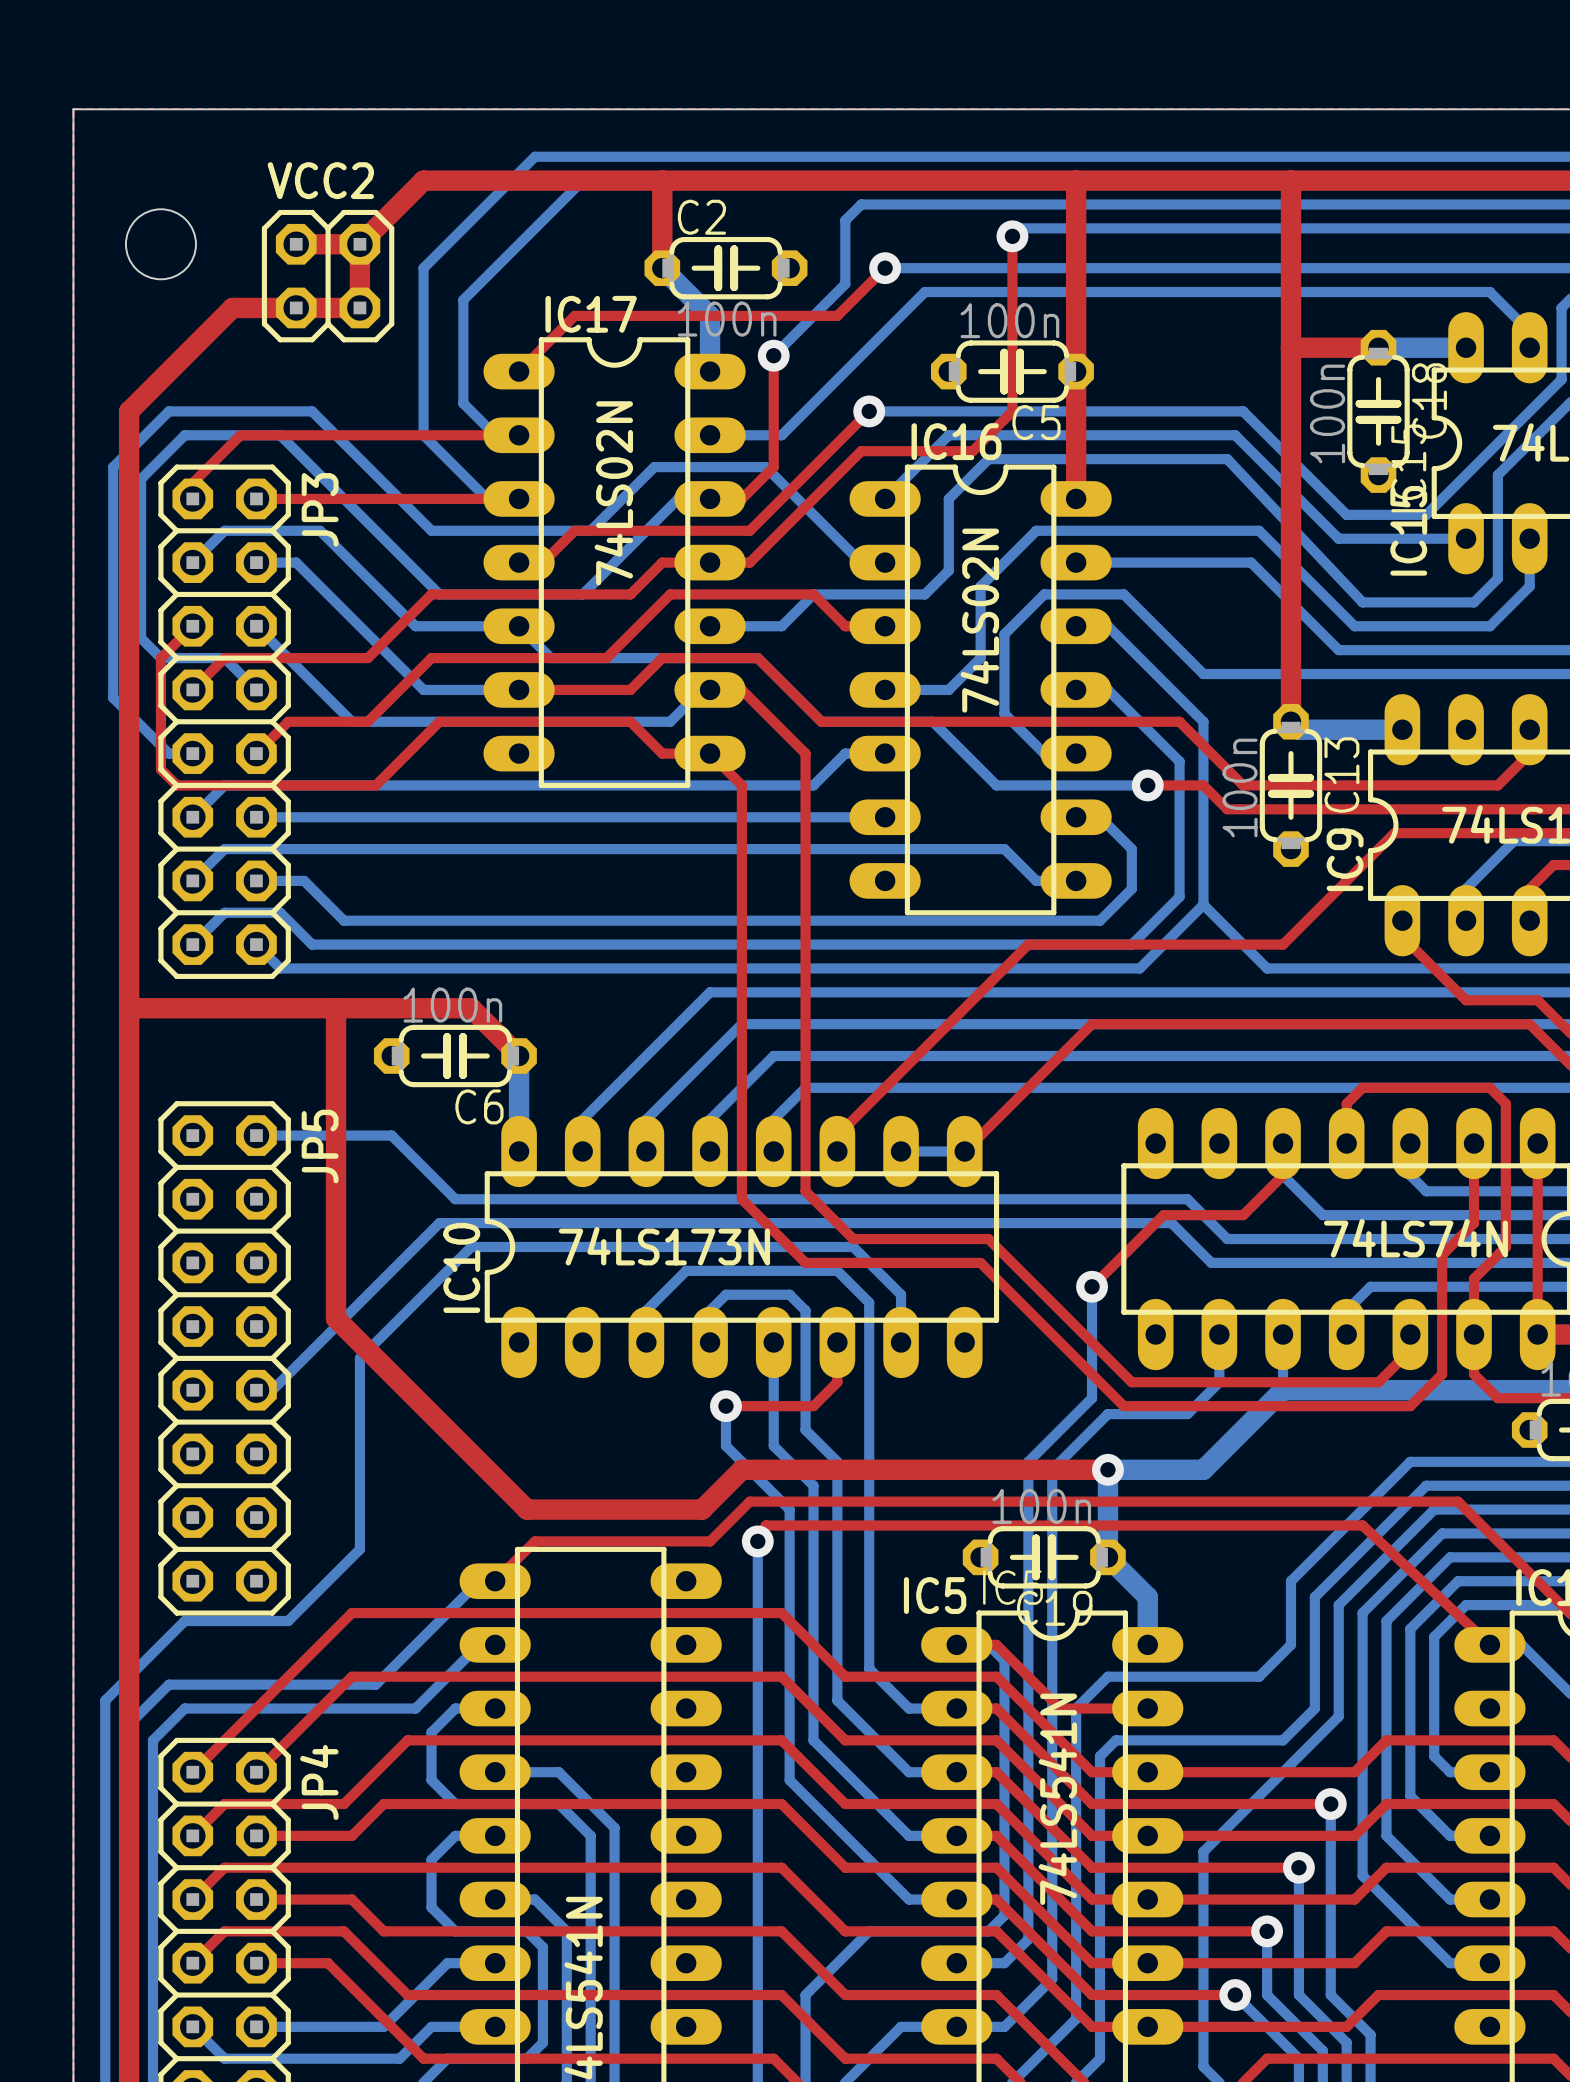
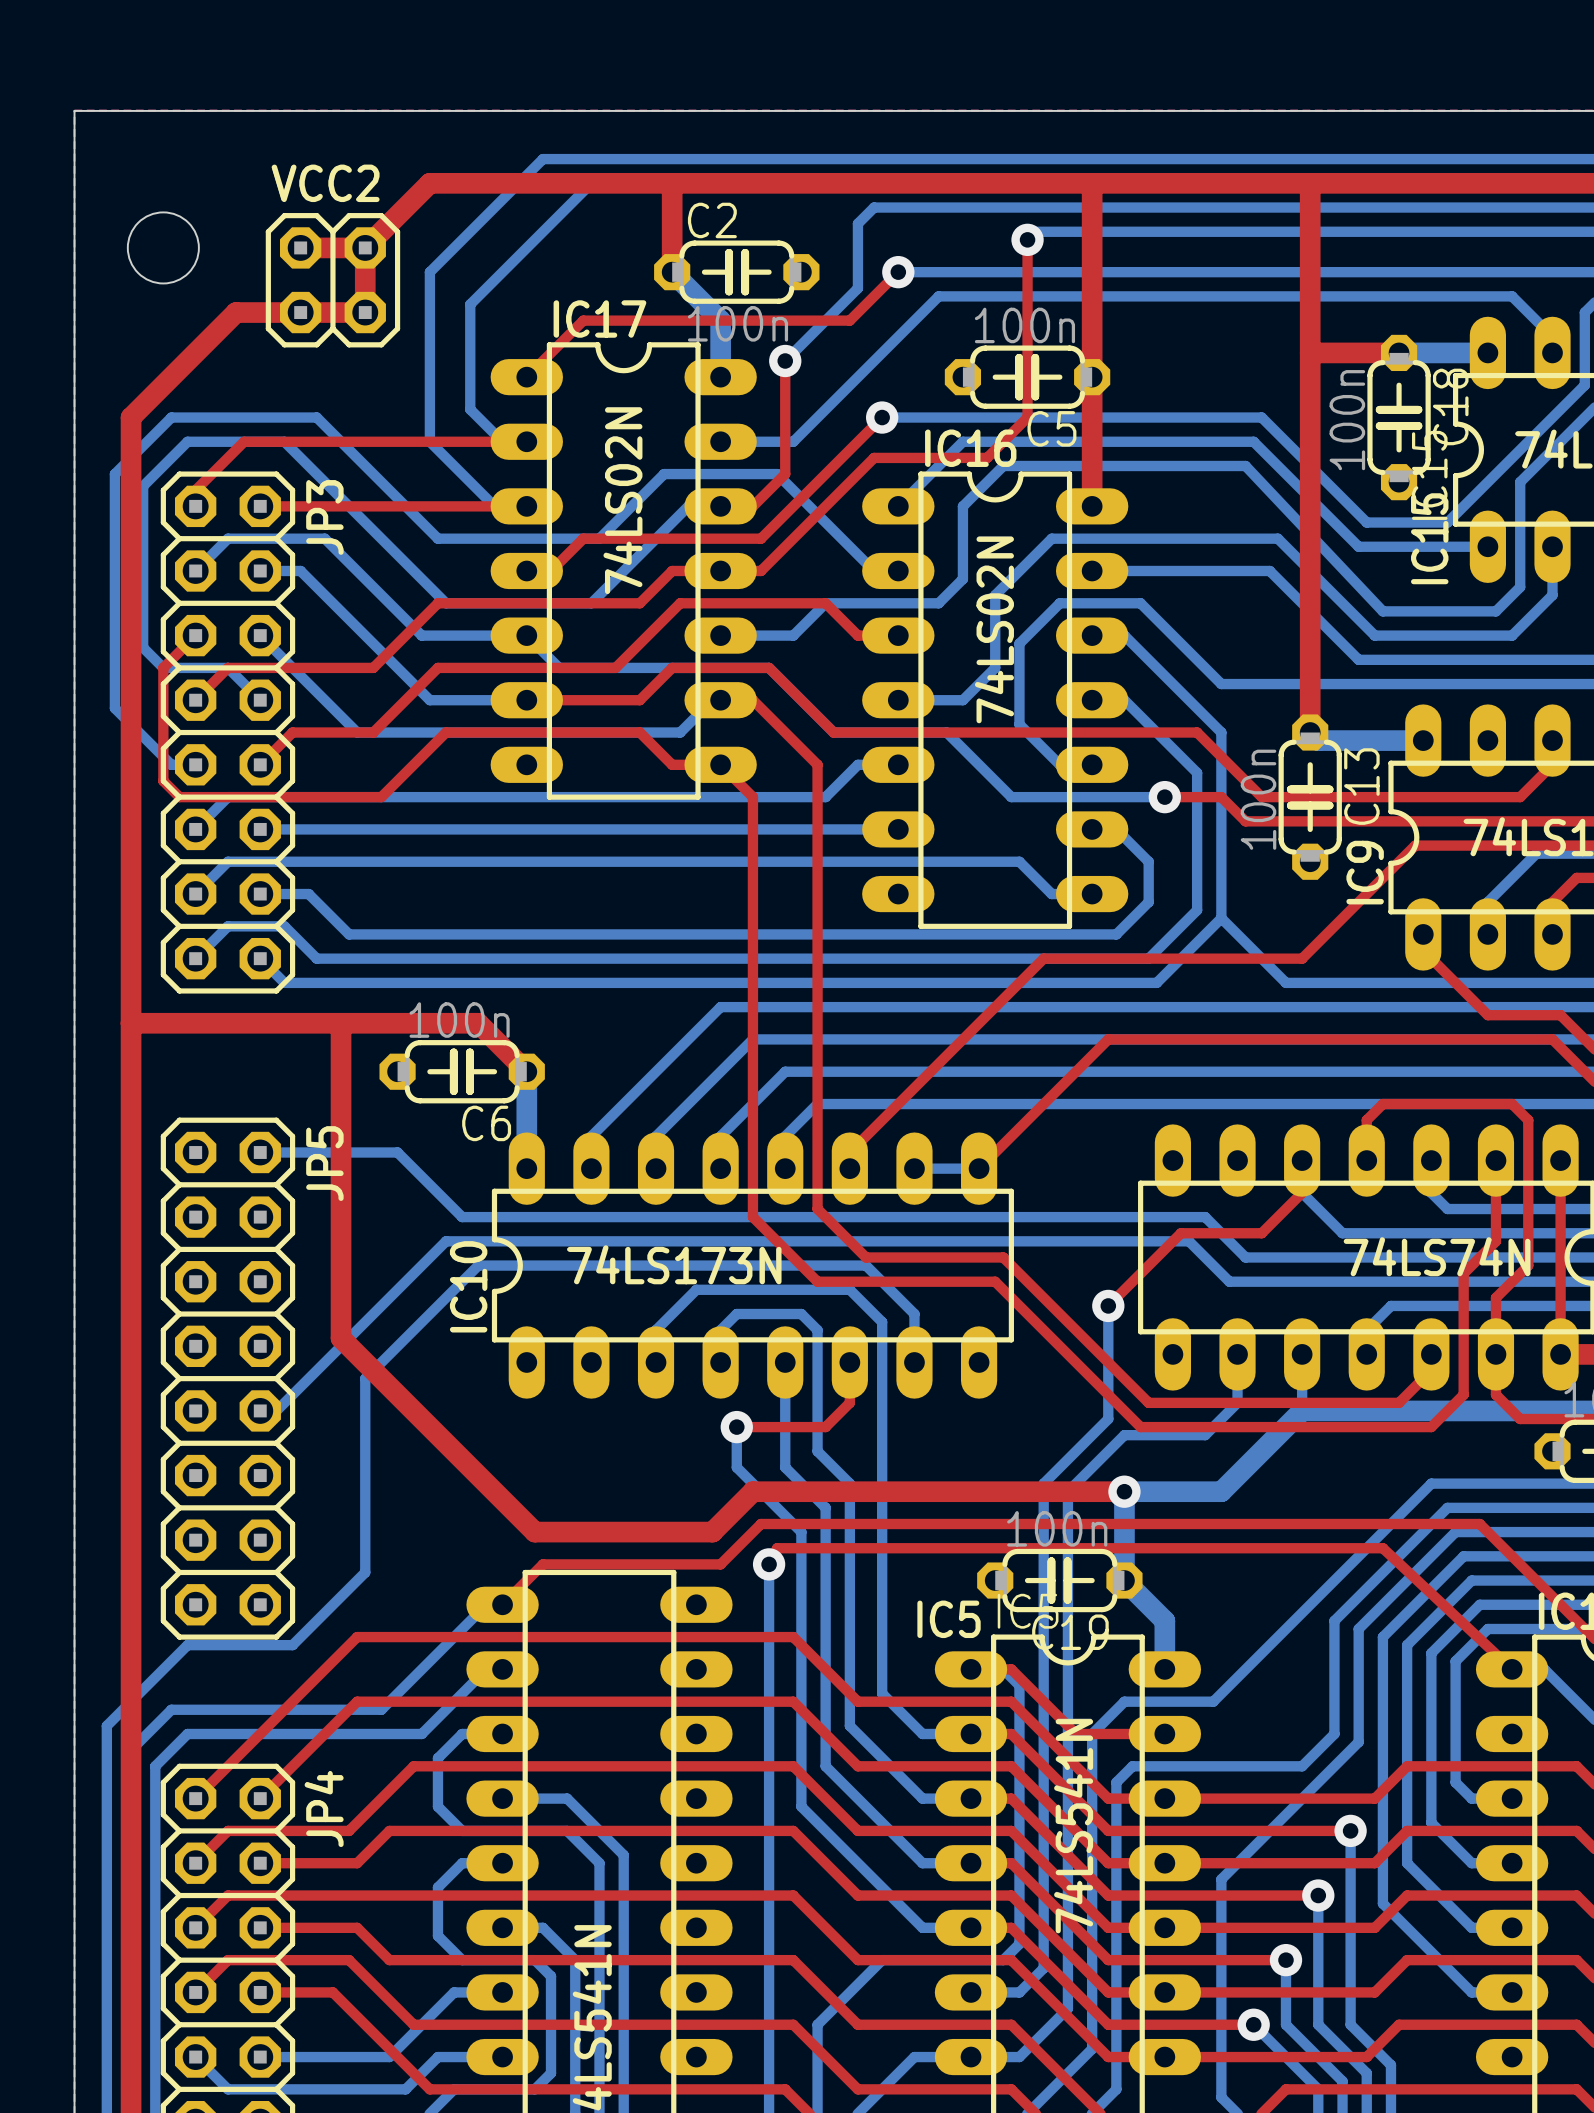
bottom track: (1290, 1581) (1290, 1644) (1259, 1676) (1195, 1676) -> (1310, 1604) (1213, 1701)

